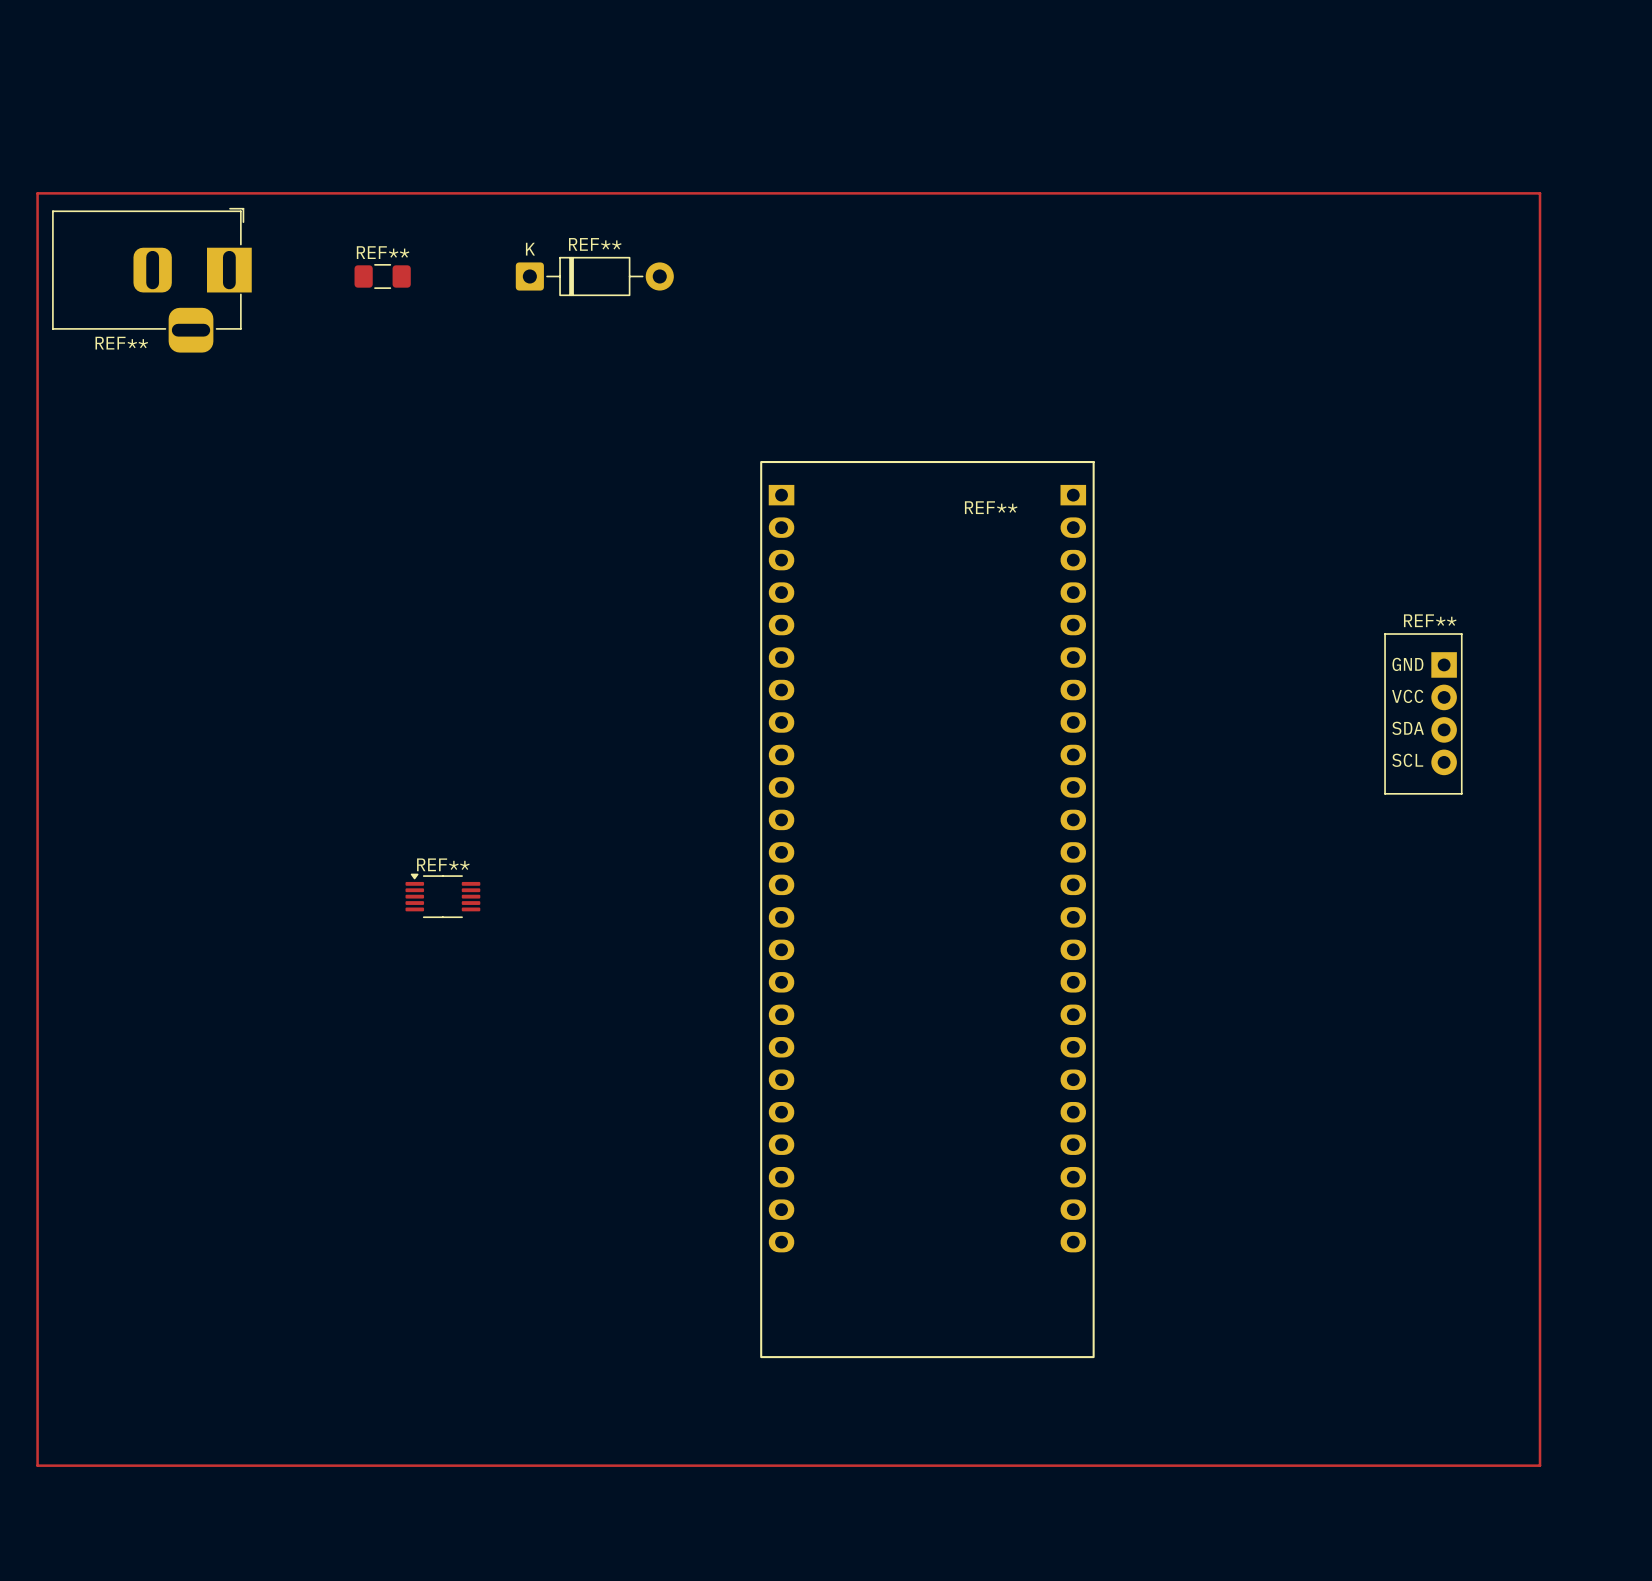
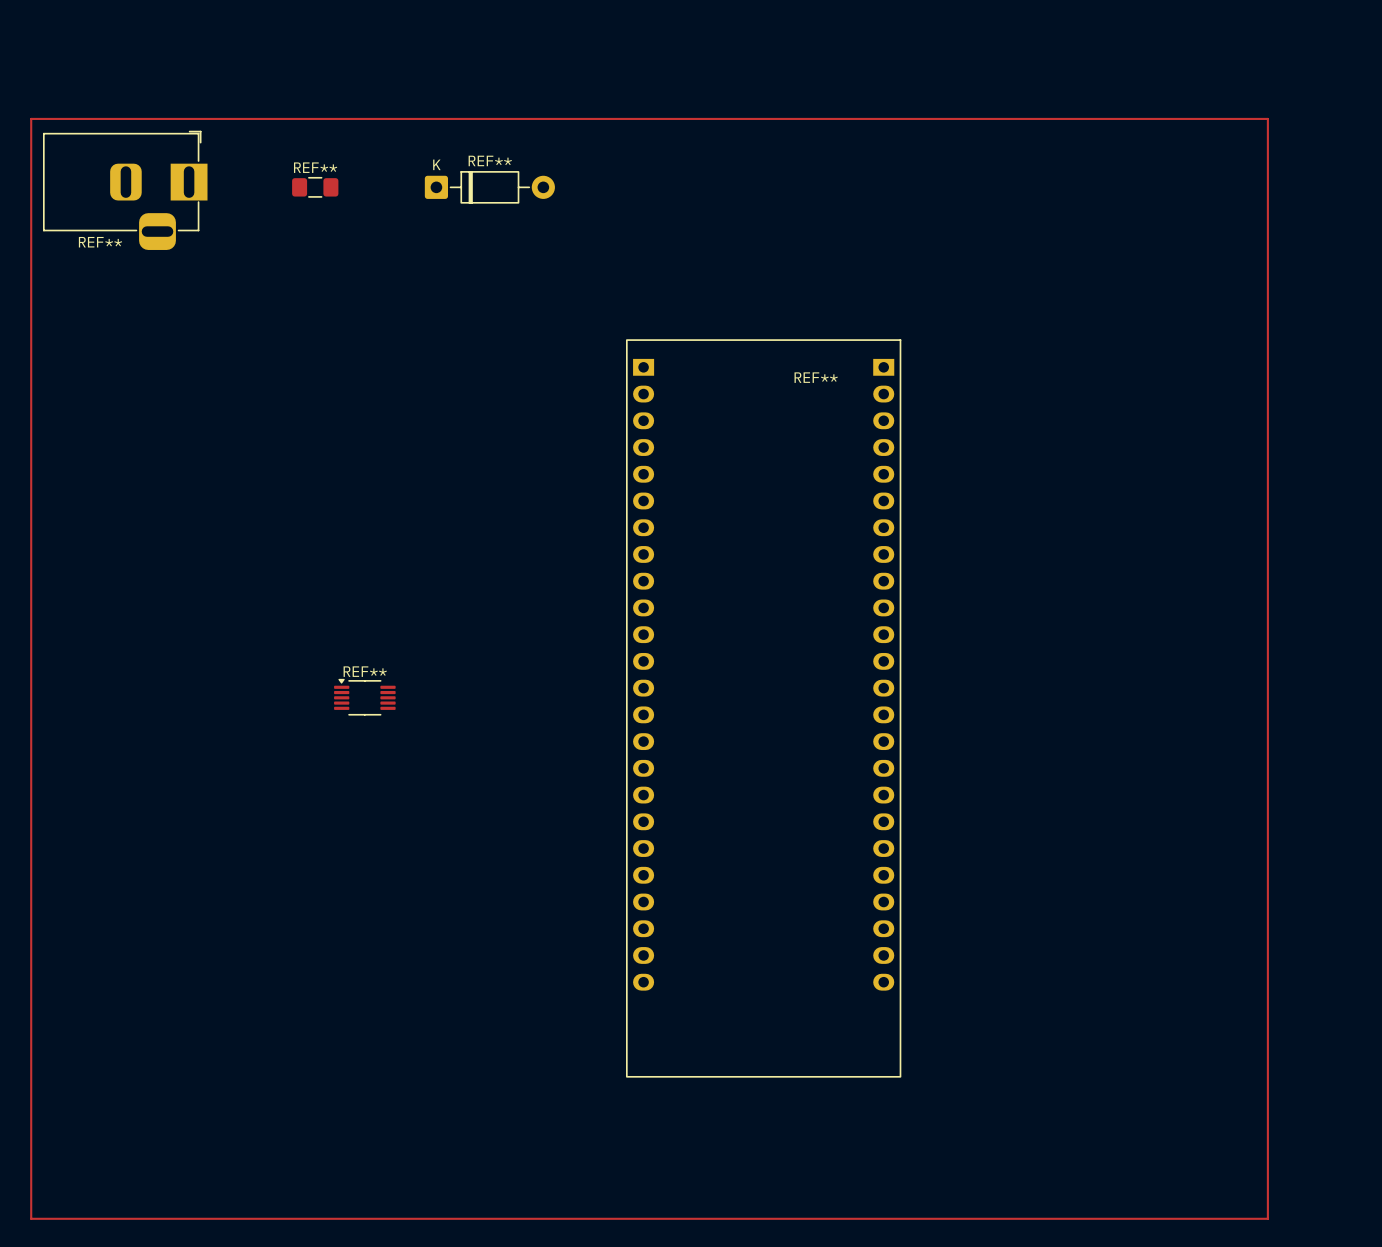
REF**: (1423, 713) -> none
track: (37, 1465) (1540, 1465) -> (31, 1166) (31, 1218) (1267, 1218) (1267, 1166)

